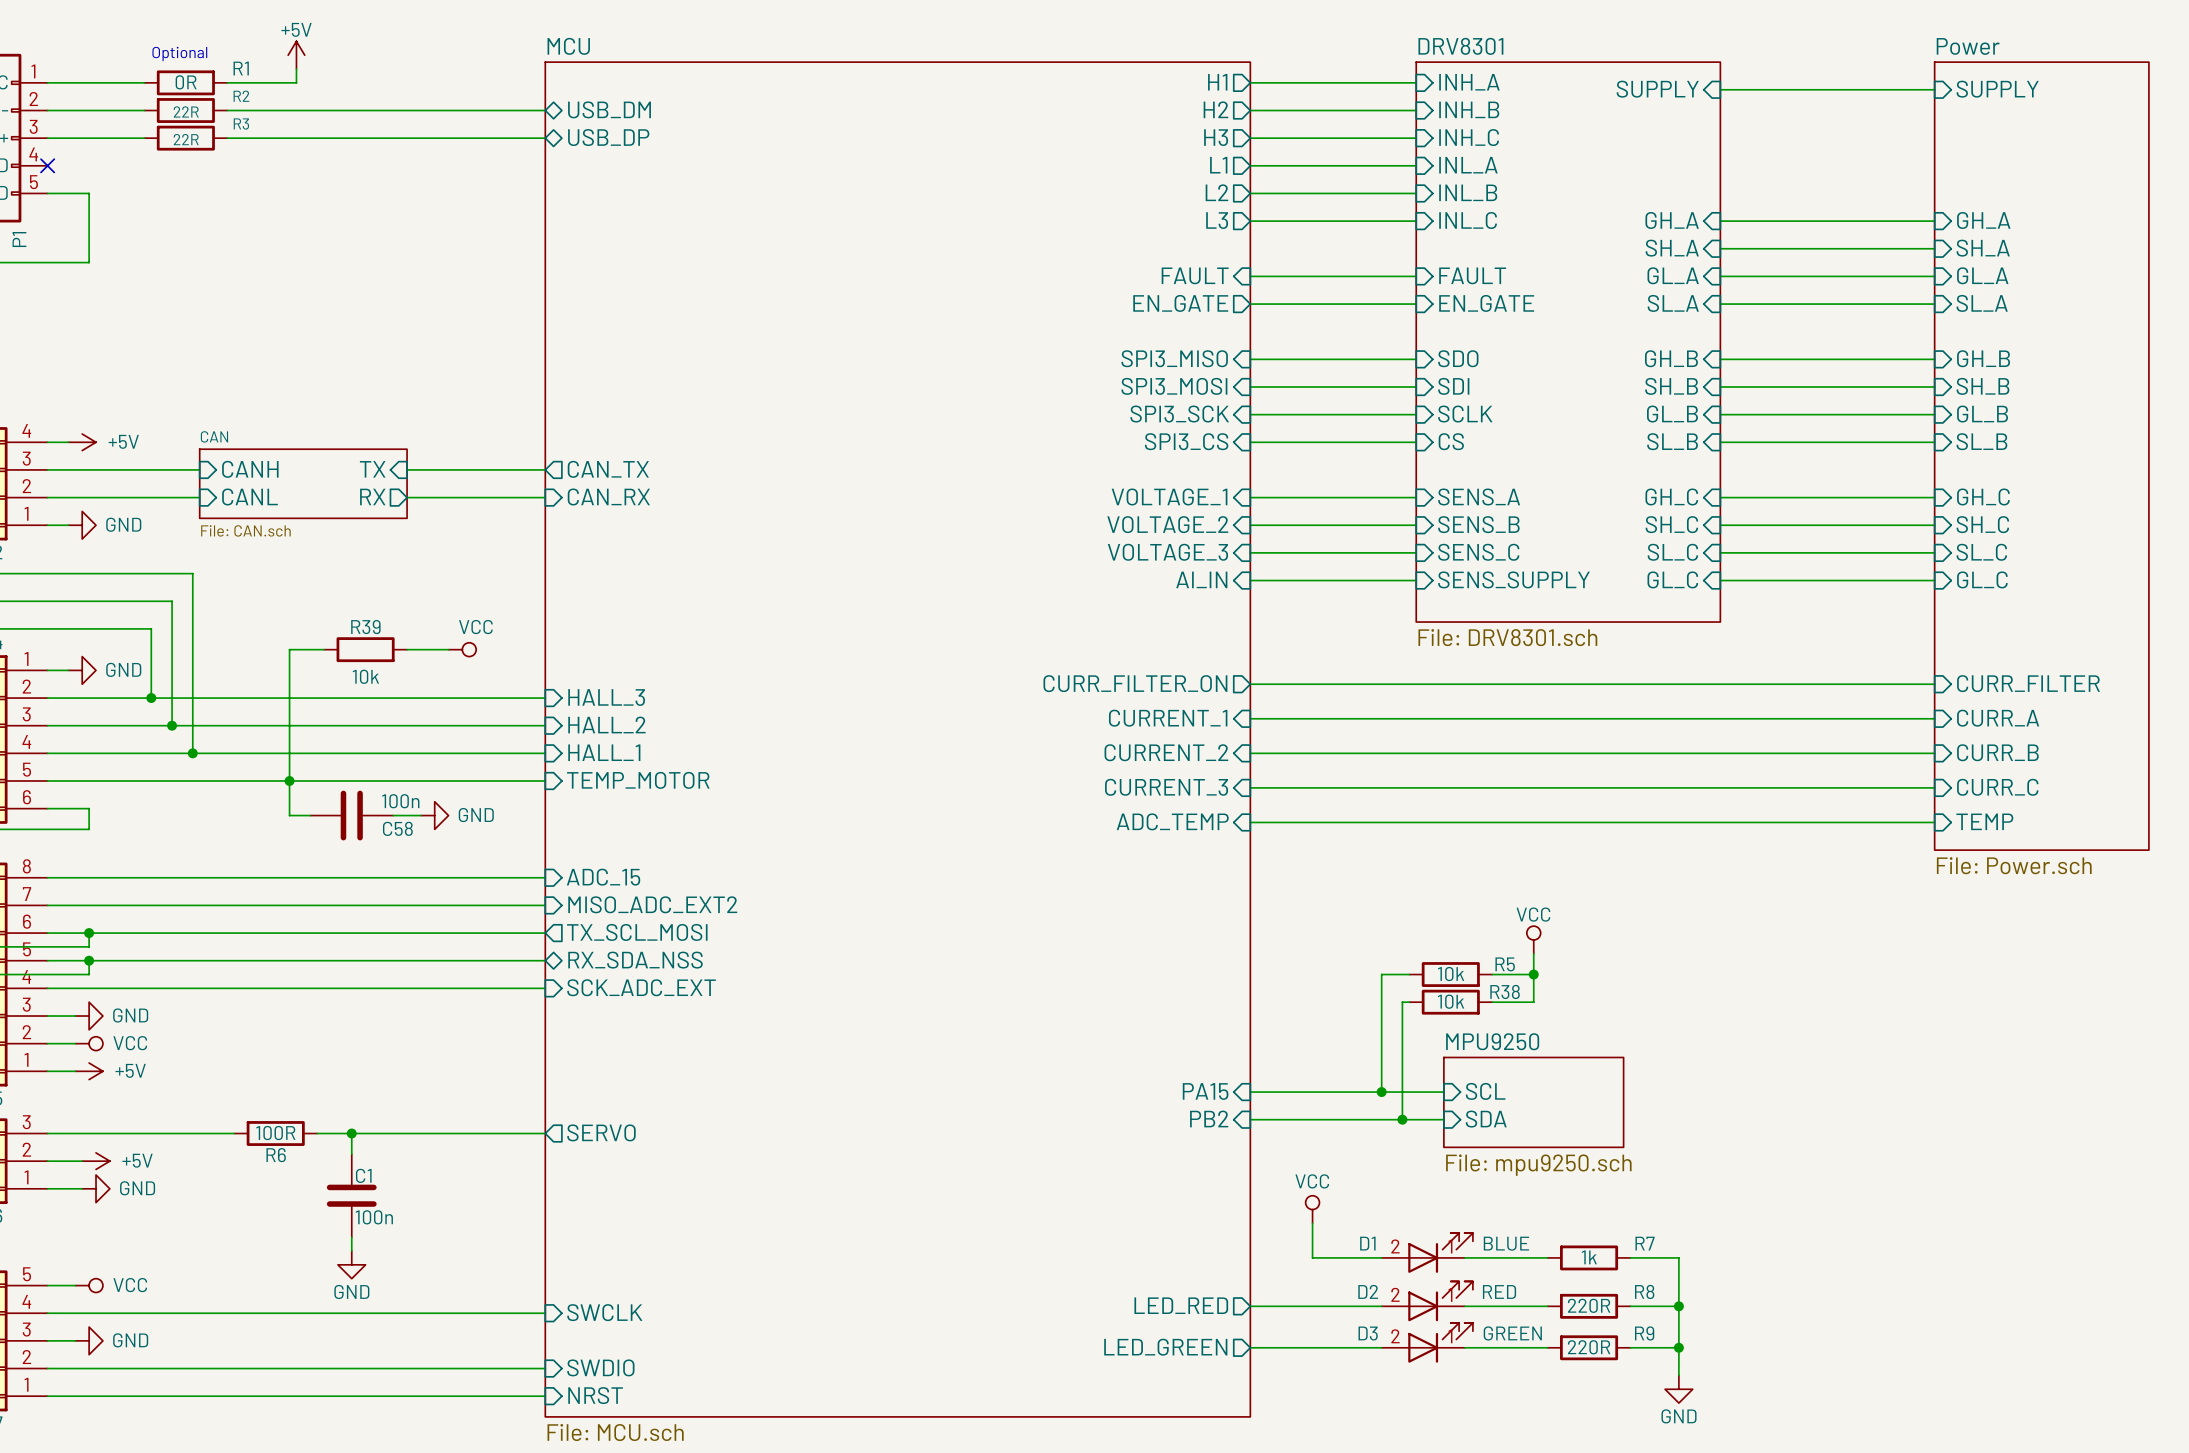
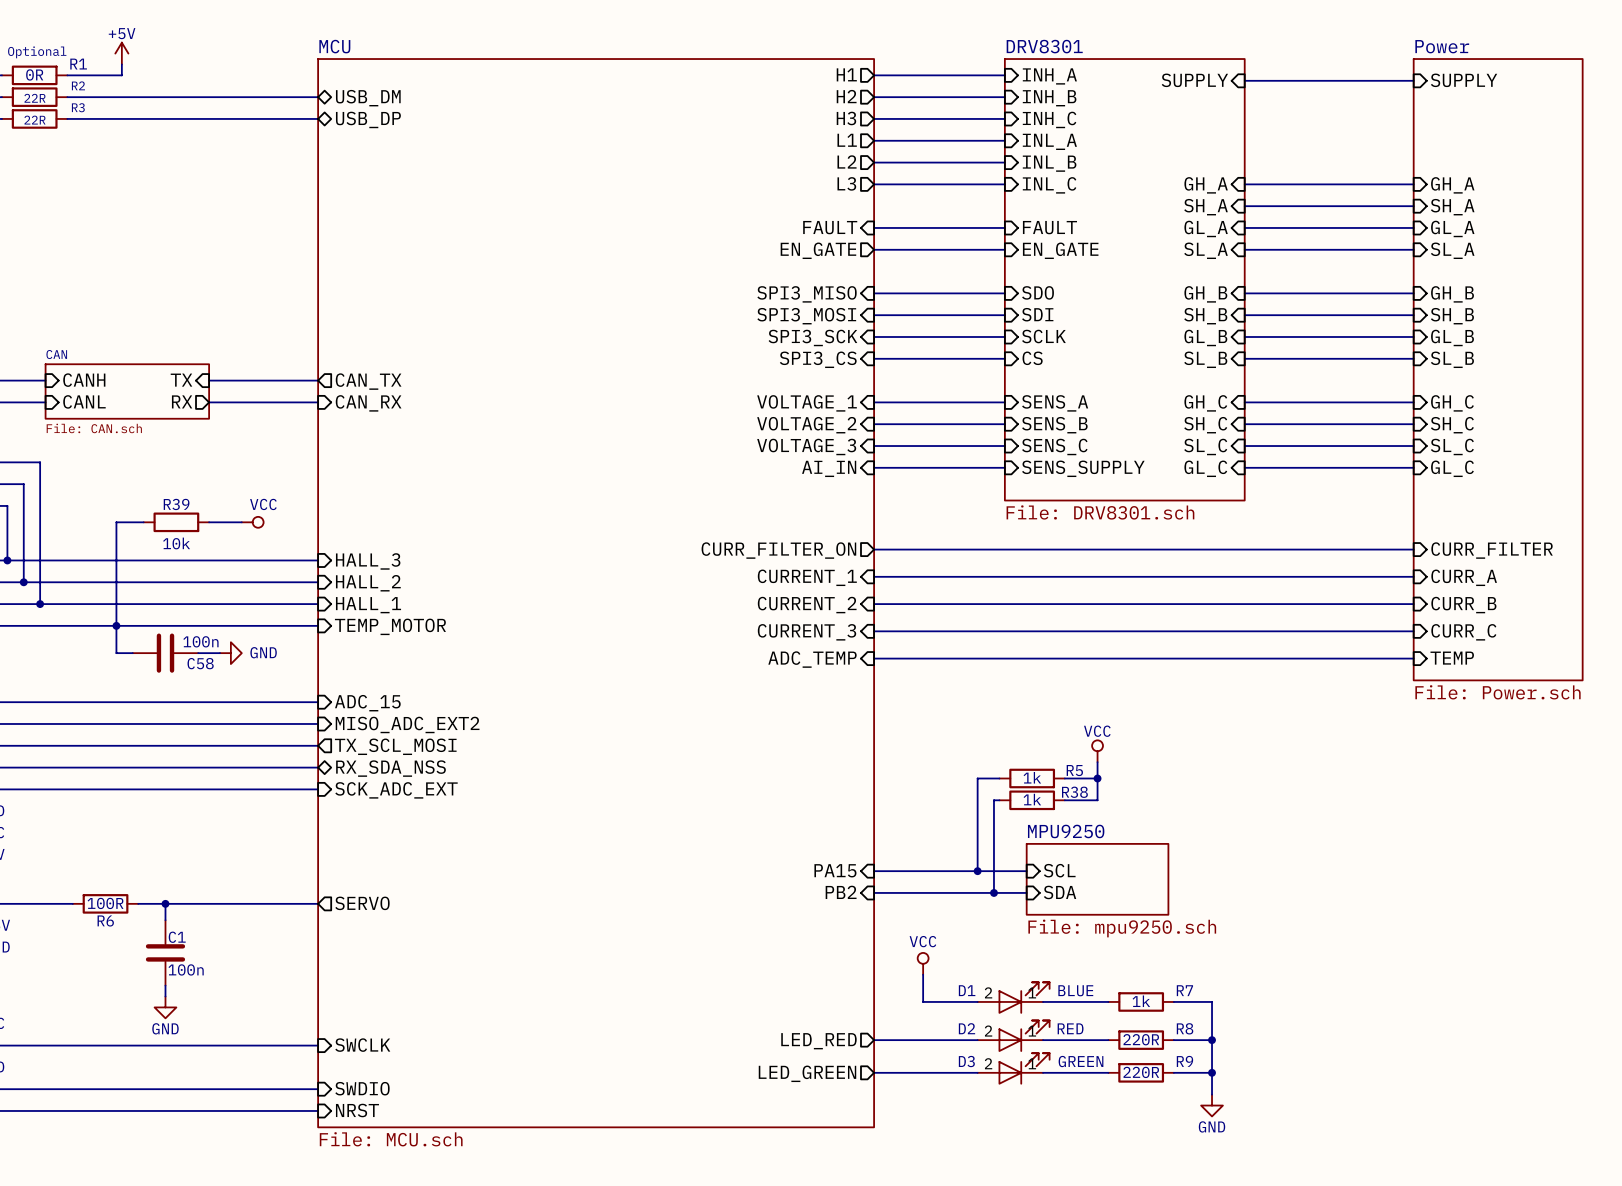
R5 value: 10k (1451, 974) -> 1k (1032, 777)
R38 value: 10k (1451, 1001) -> 1k (1032, 799)

